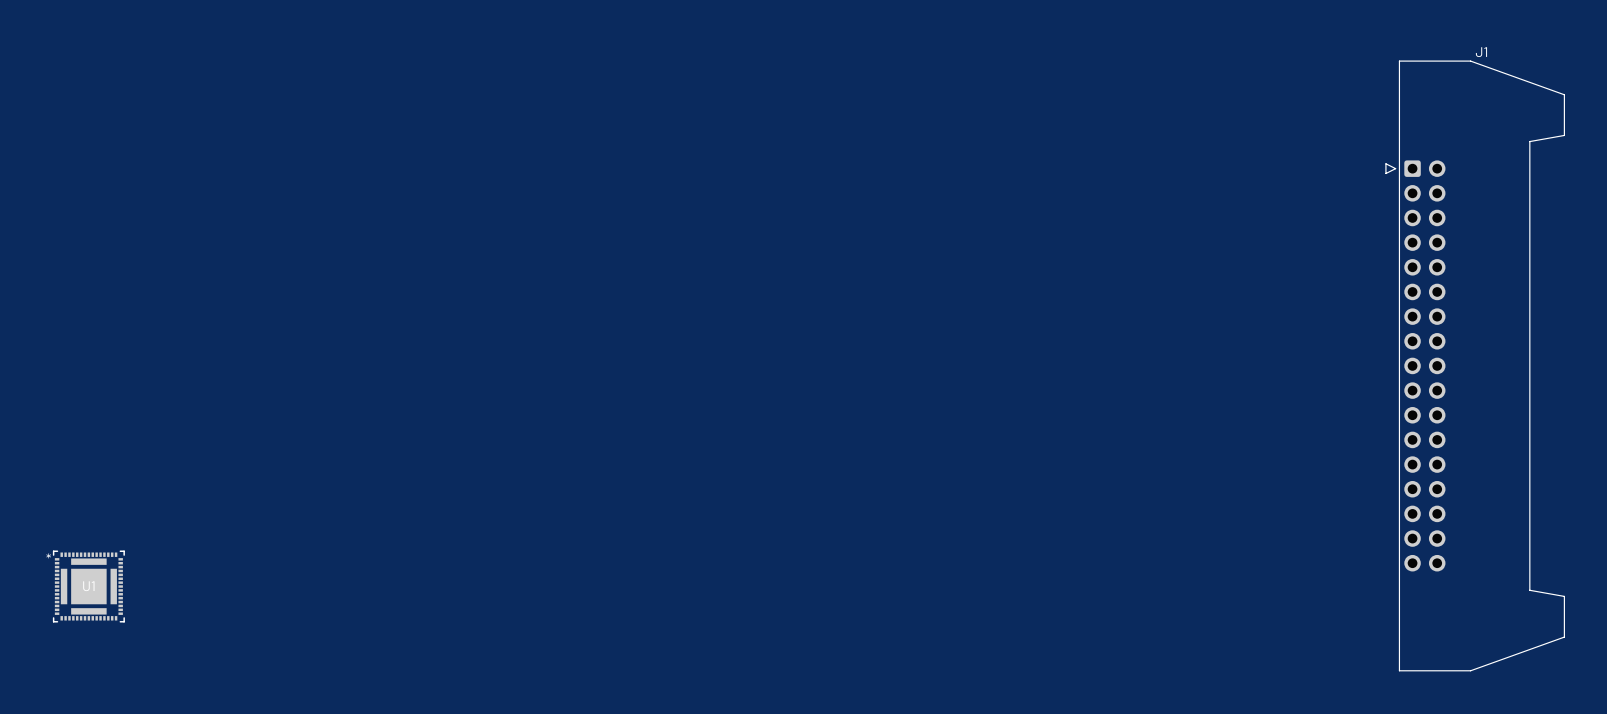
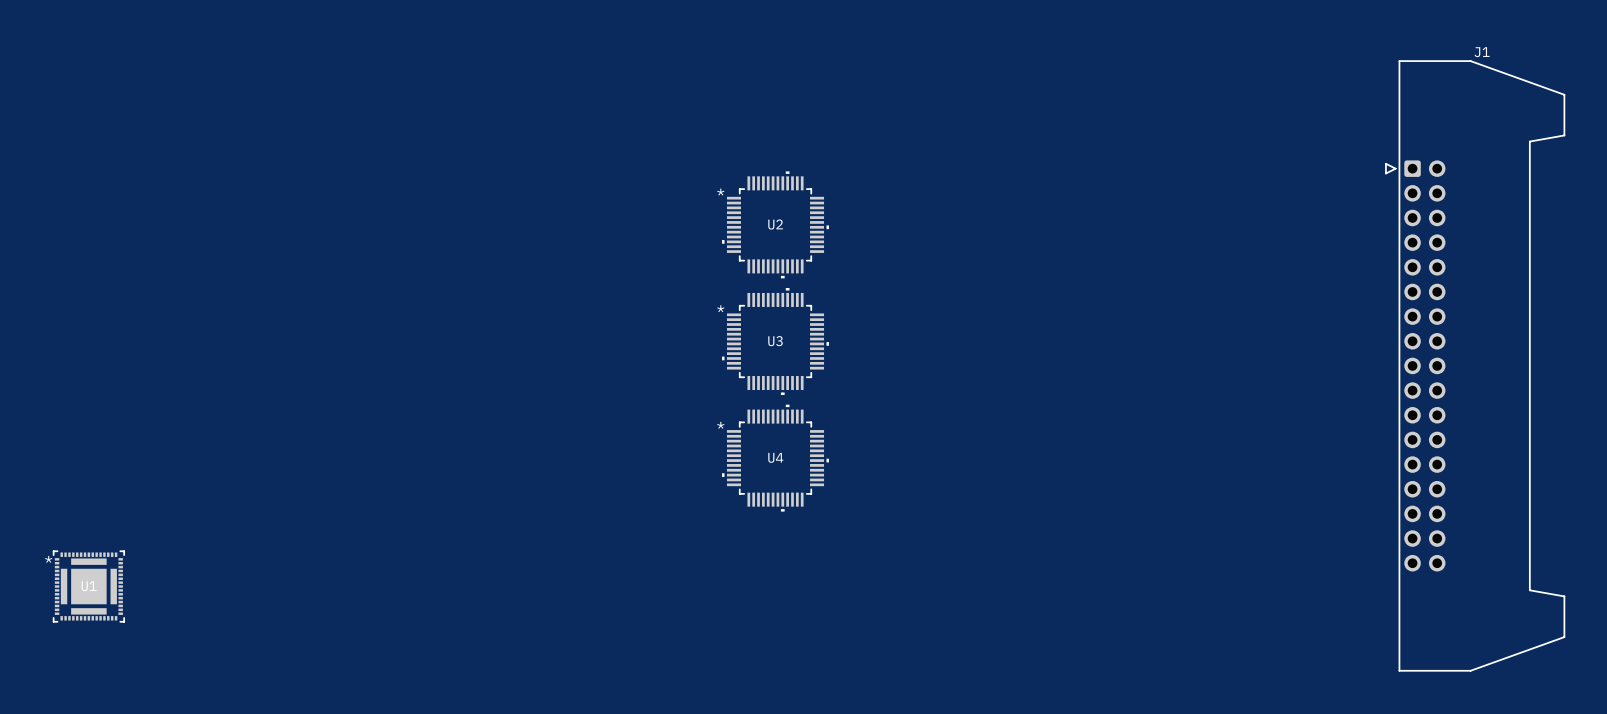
U2: none -> (775, 224)
U3: none -> (775, 341)
U4: none -> (775, 458)

